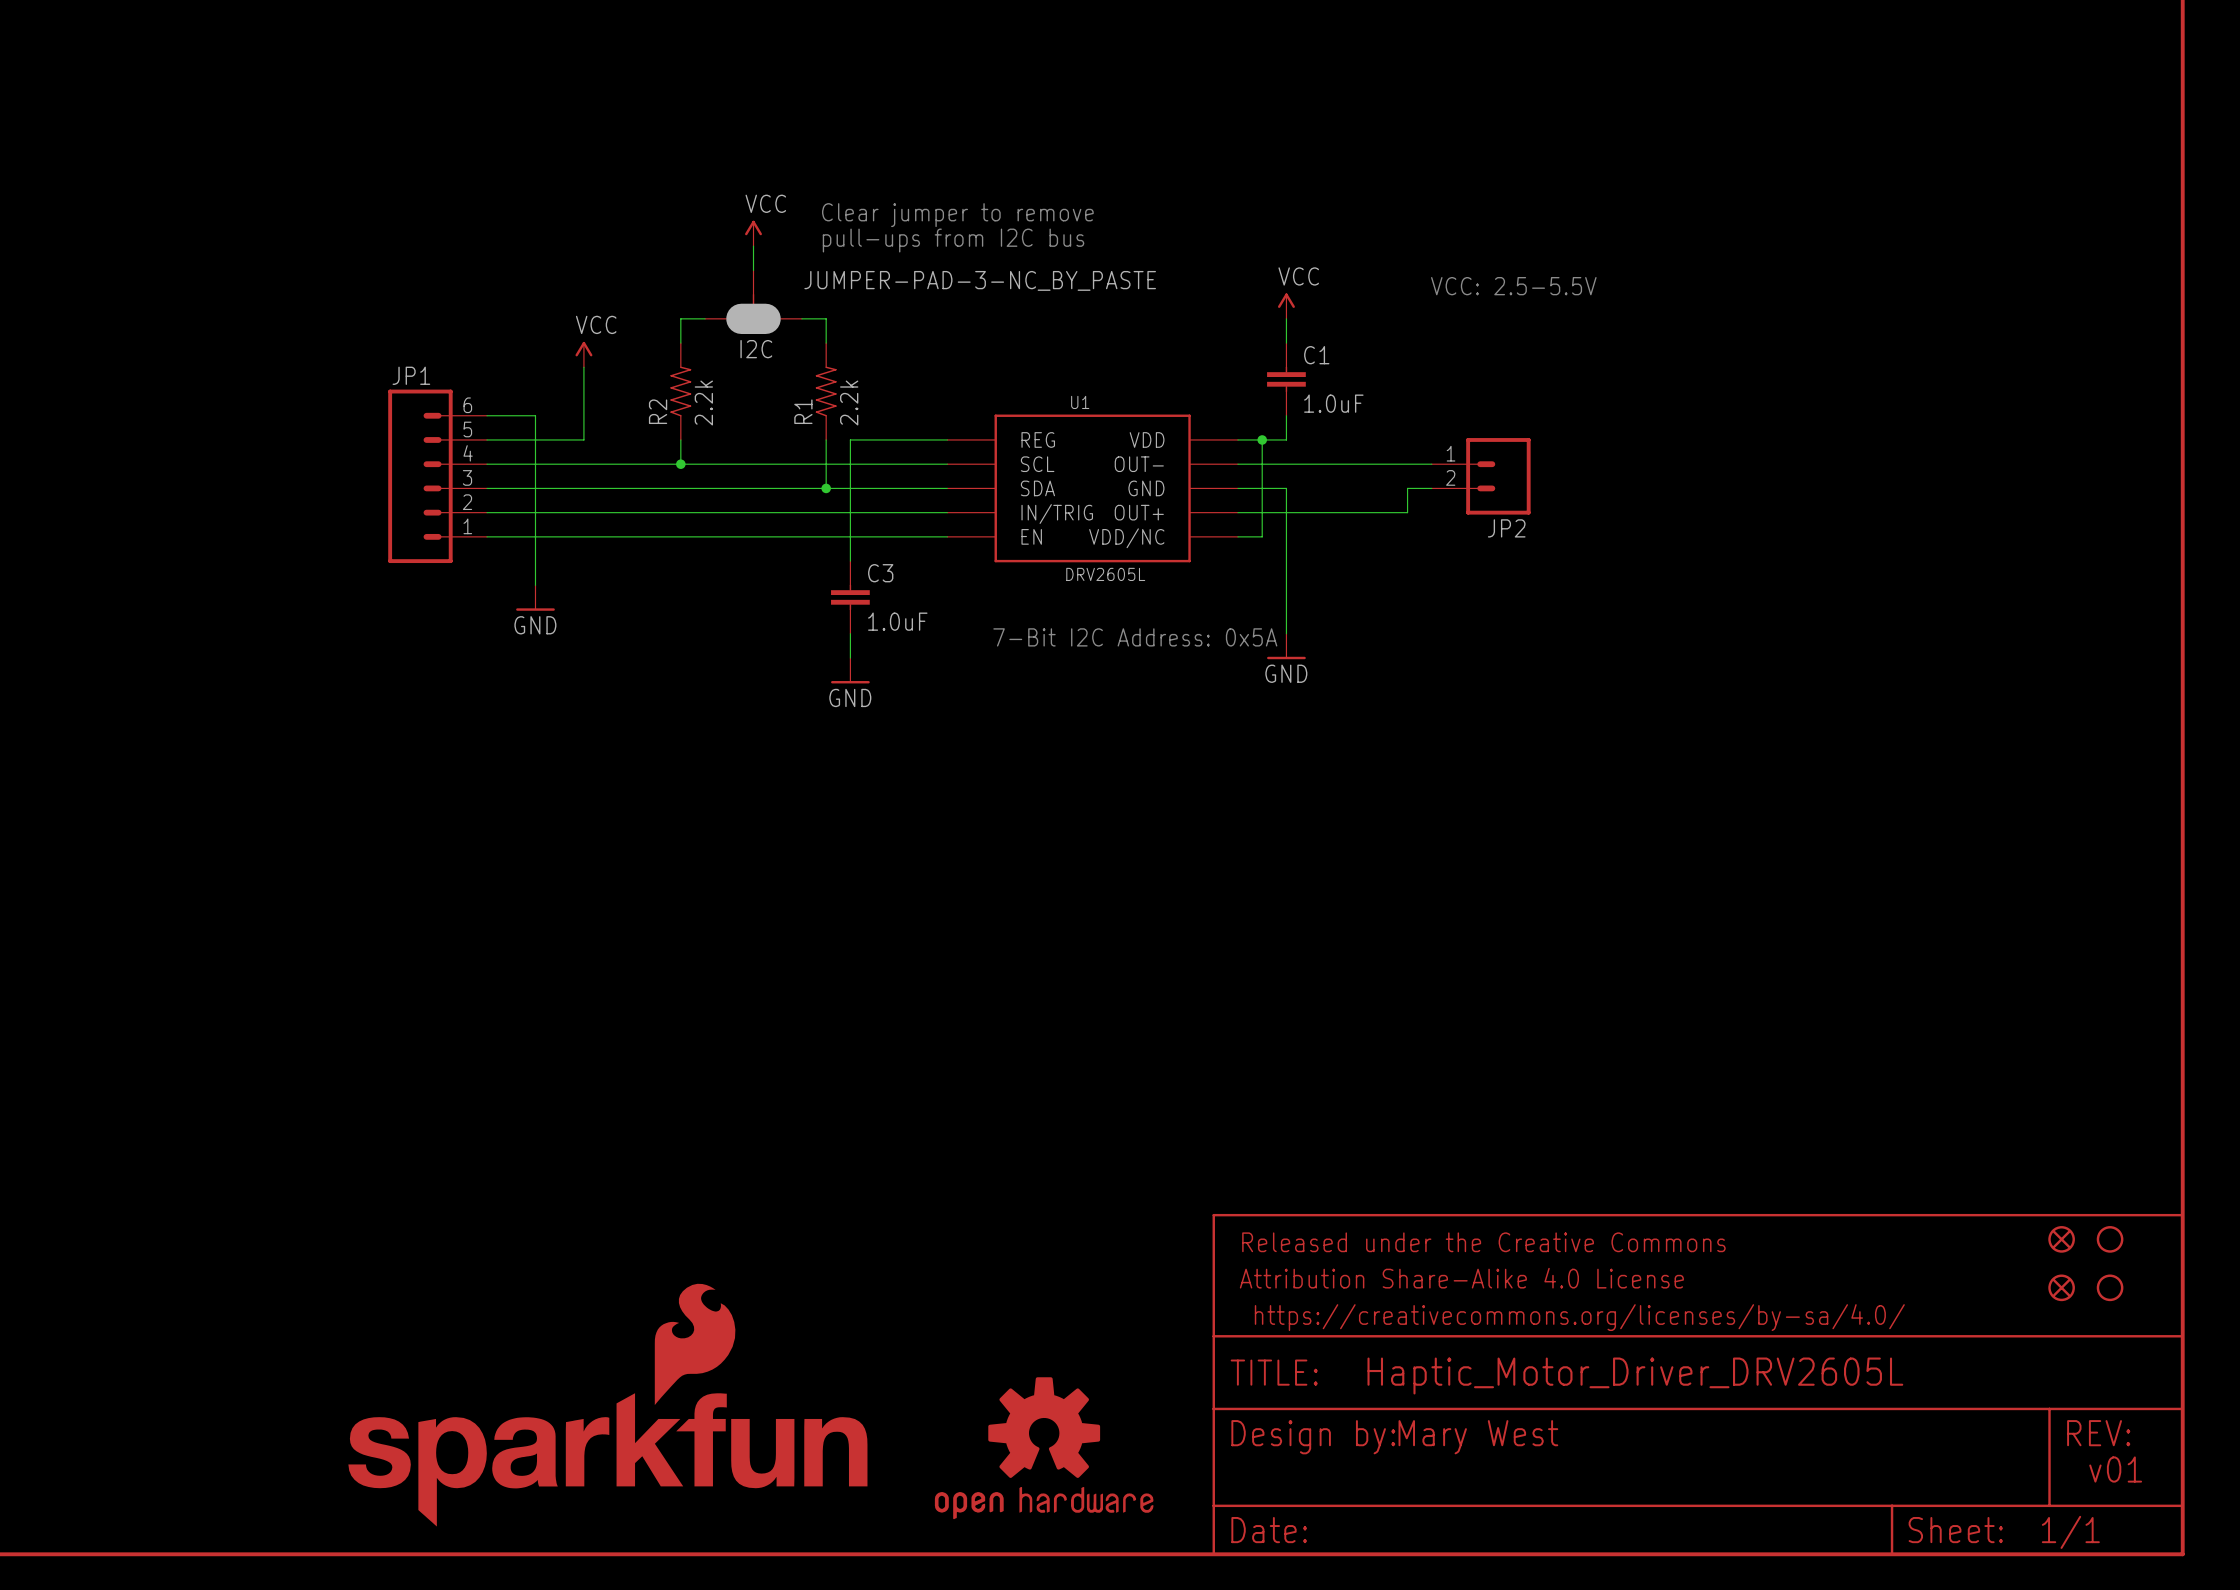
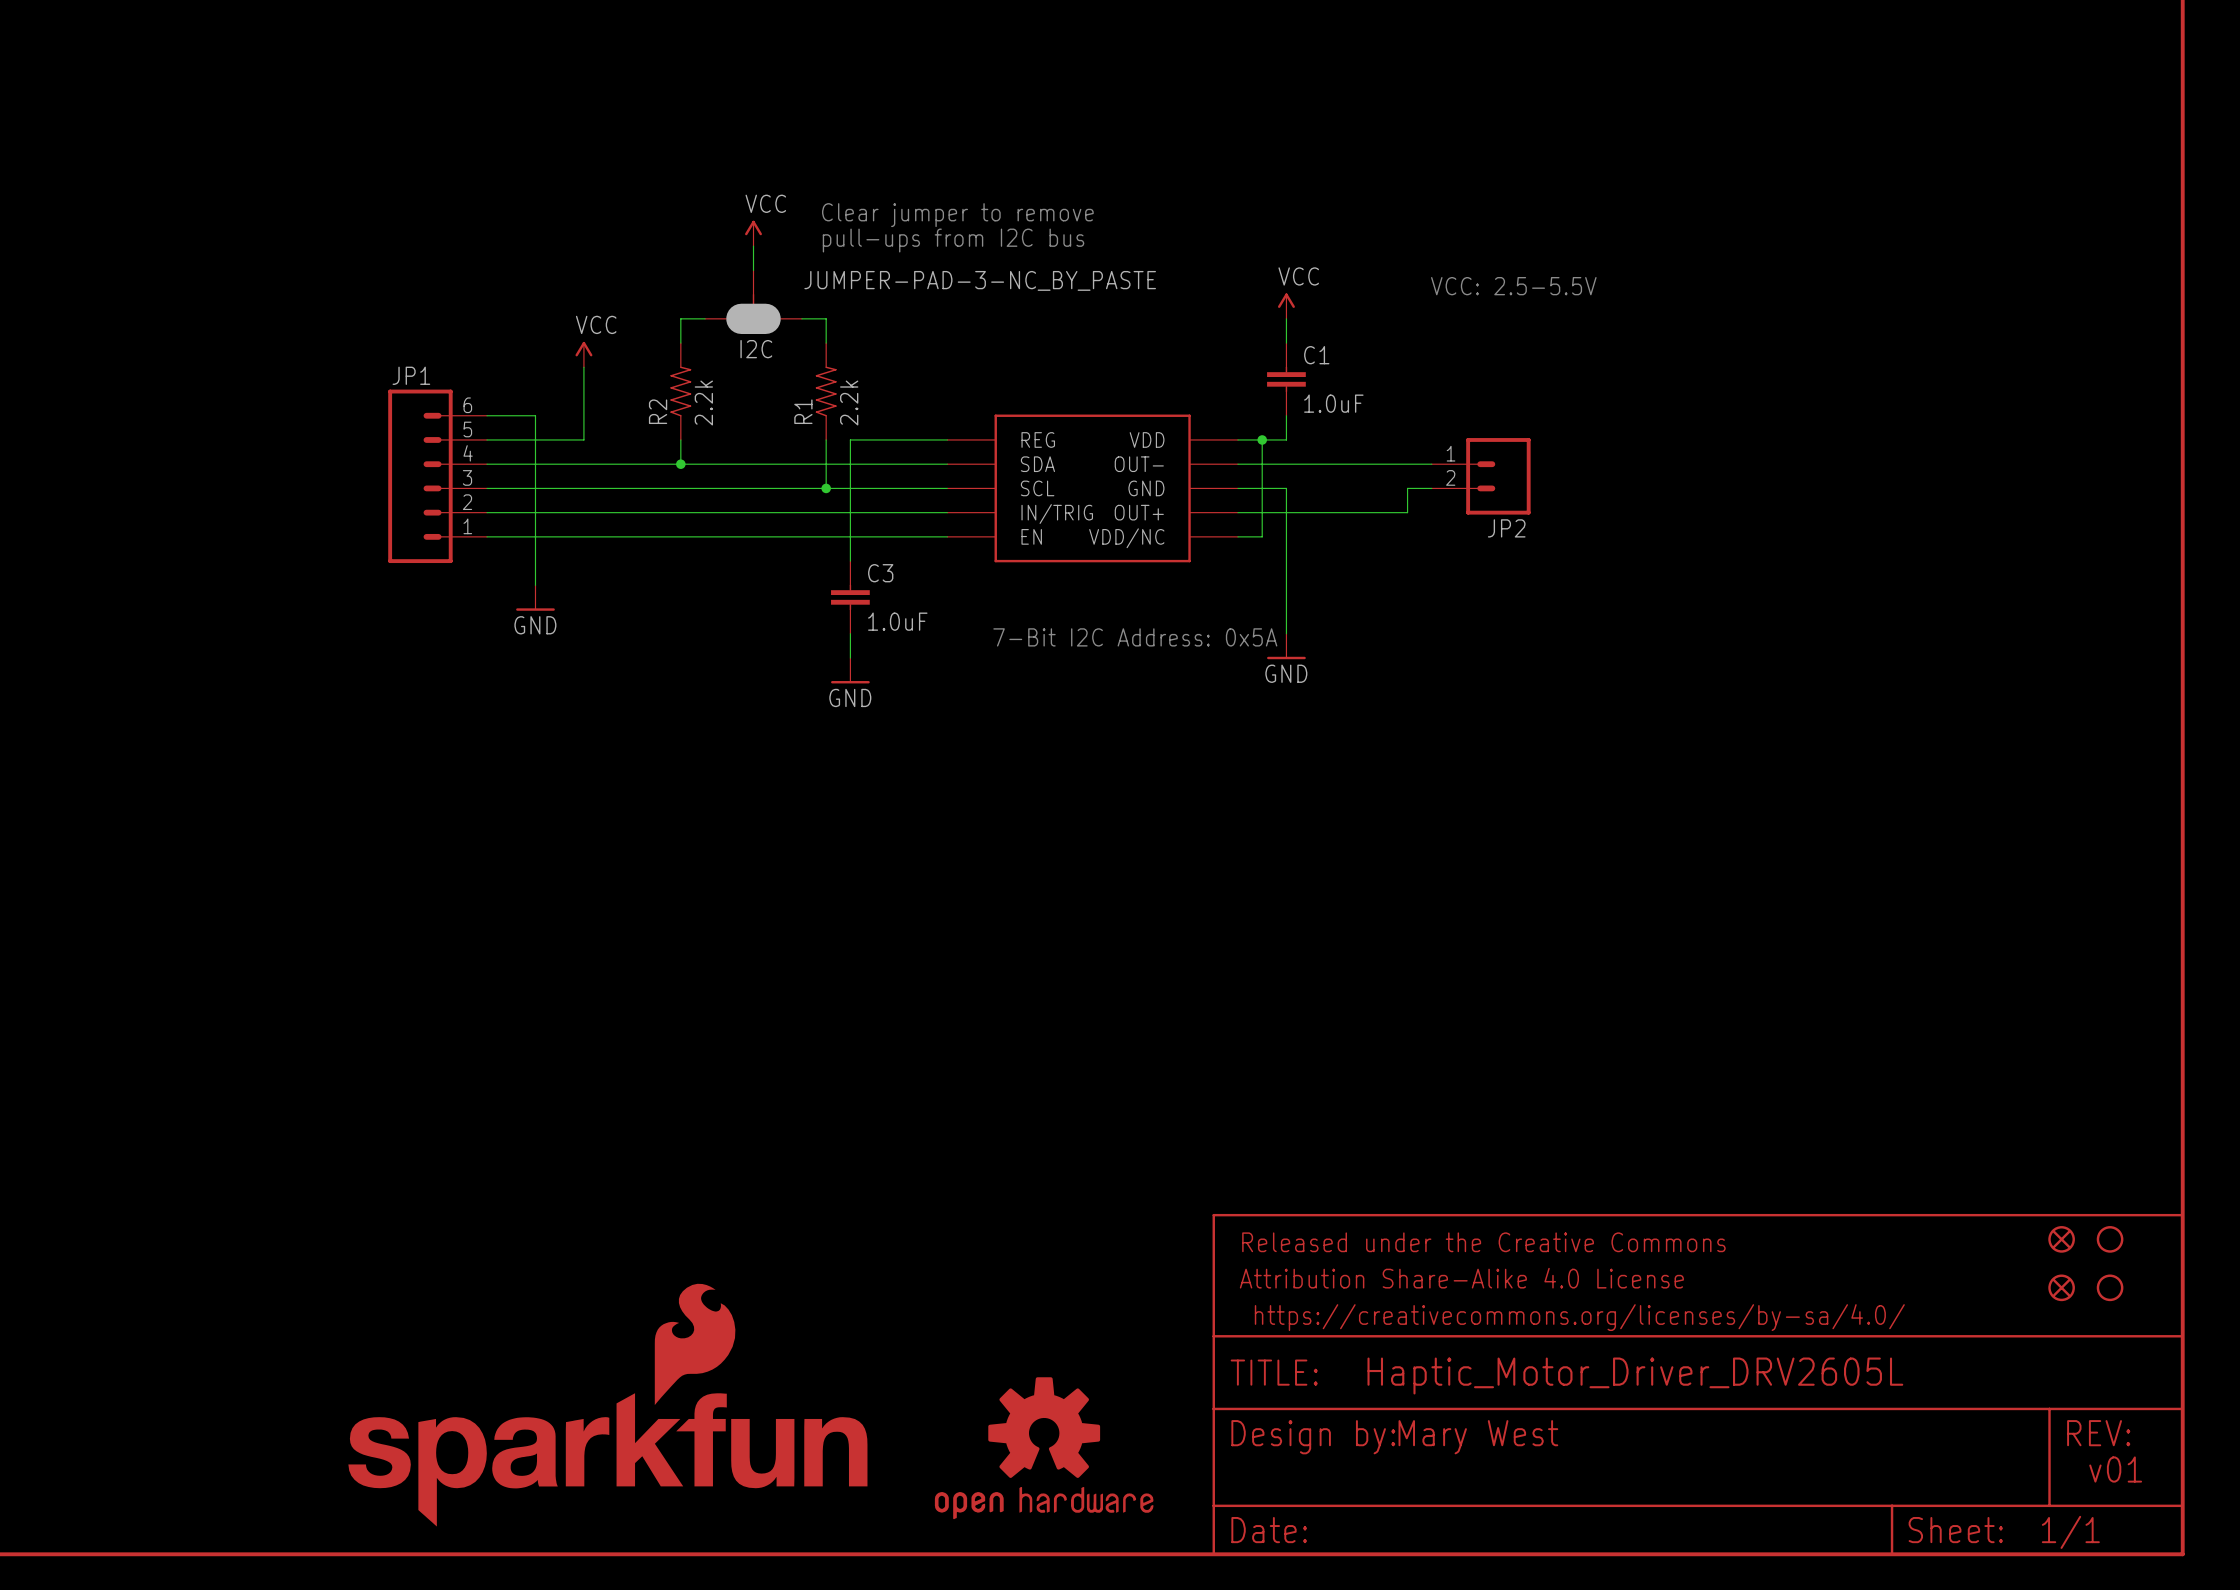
U1 name: U1 (1080, 402) -> none
U1 pin name: SCL (1037, 464) -> SDA (1037, 464)
U1 pin name: SDA (1037, 488) -> SCL (1037, 488)
U1 value: DRV2605L (1105, 574) -> none

